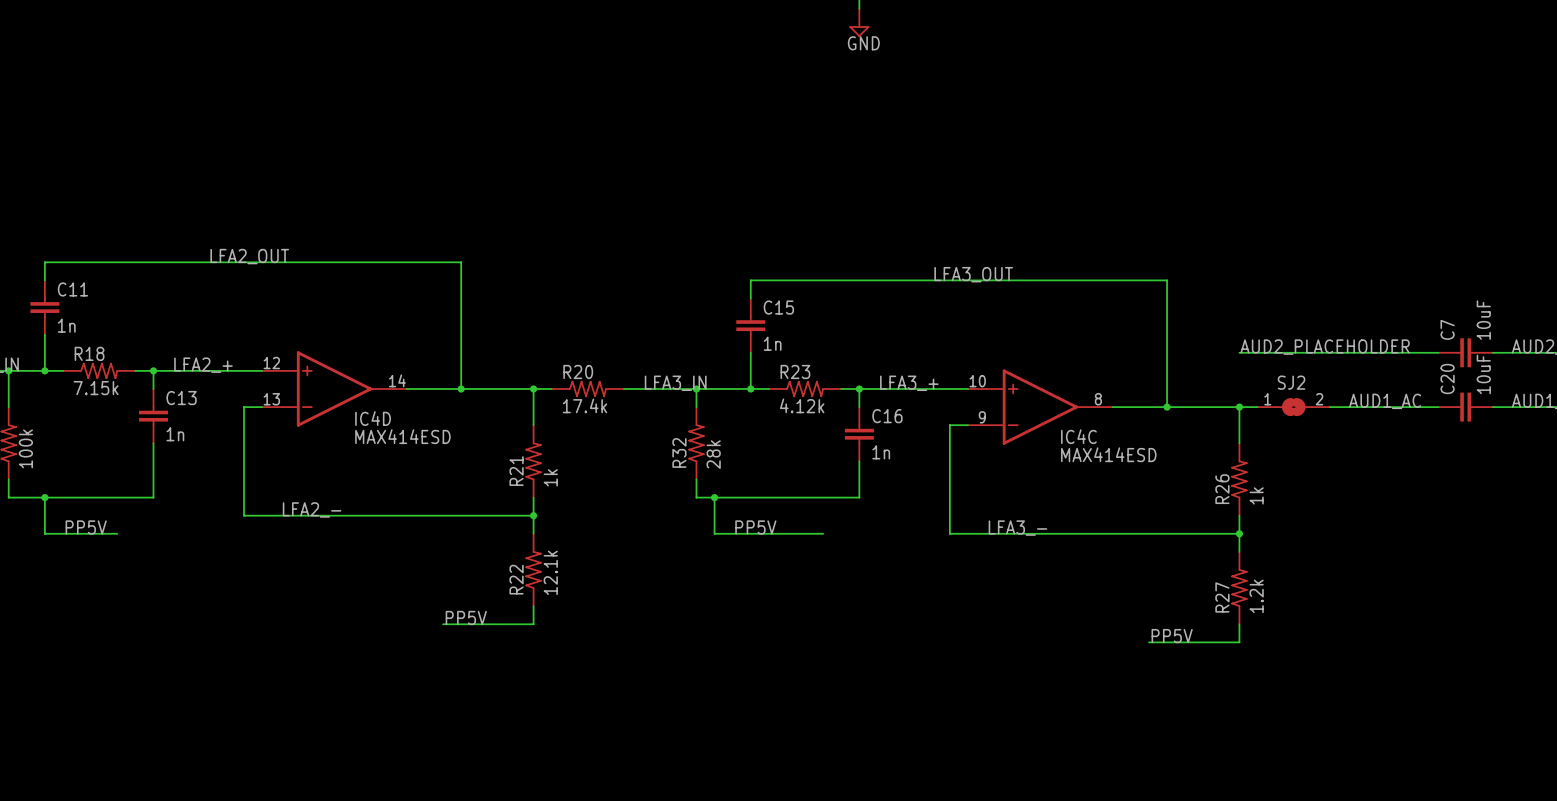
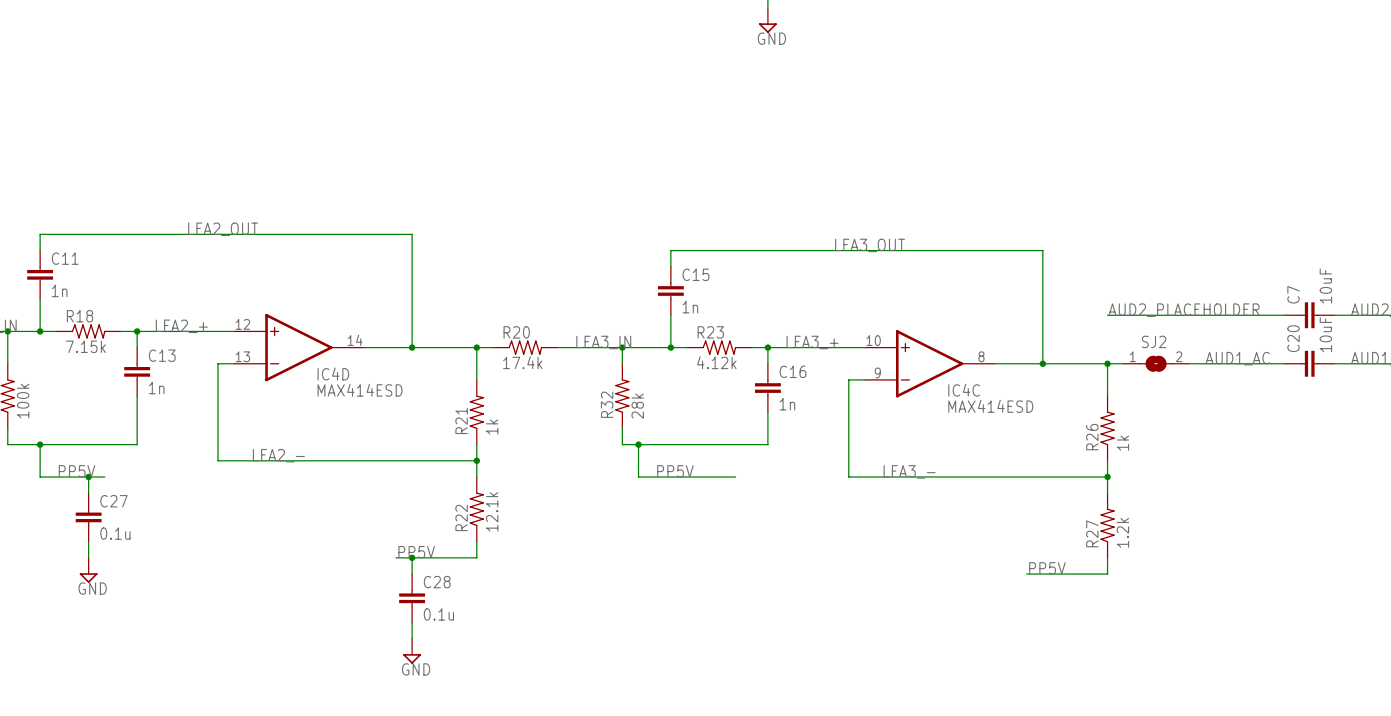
wire: none -> (88, 476) (88, 493)
junction: none -> (88, 476)
C27: none -> 0.1u (88, 517)
wire: none -> (88, 541) (88, 557)
wire: none -> (412, 557) (412, 574)
junction: none -> (412, 557)
power symbol: none -> GND (88, 570)
C28: none -> 0.1u (412, 598)
wire: none -> (412, 622) (412, 638)
power symbol: none -> GND (412, 651)

